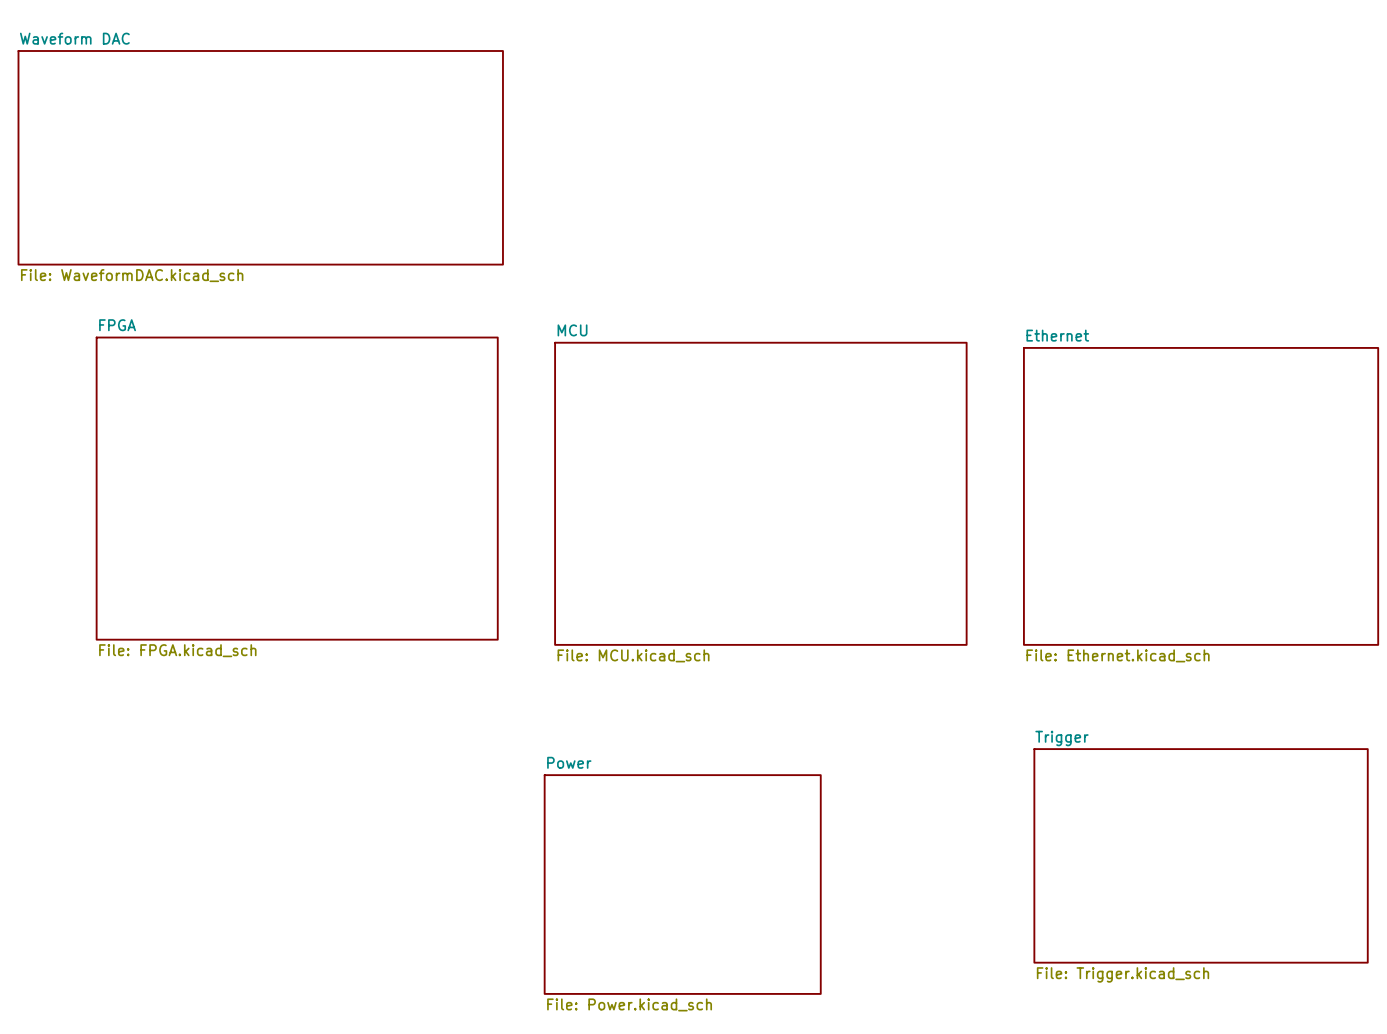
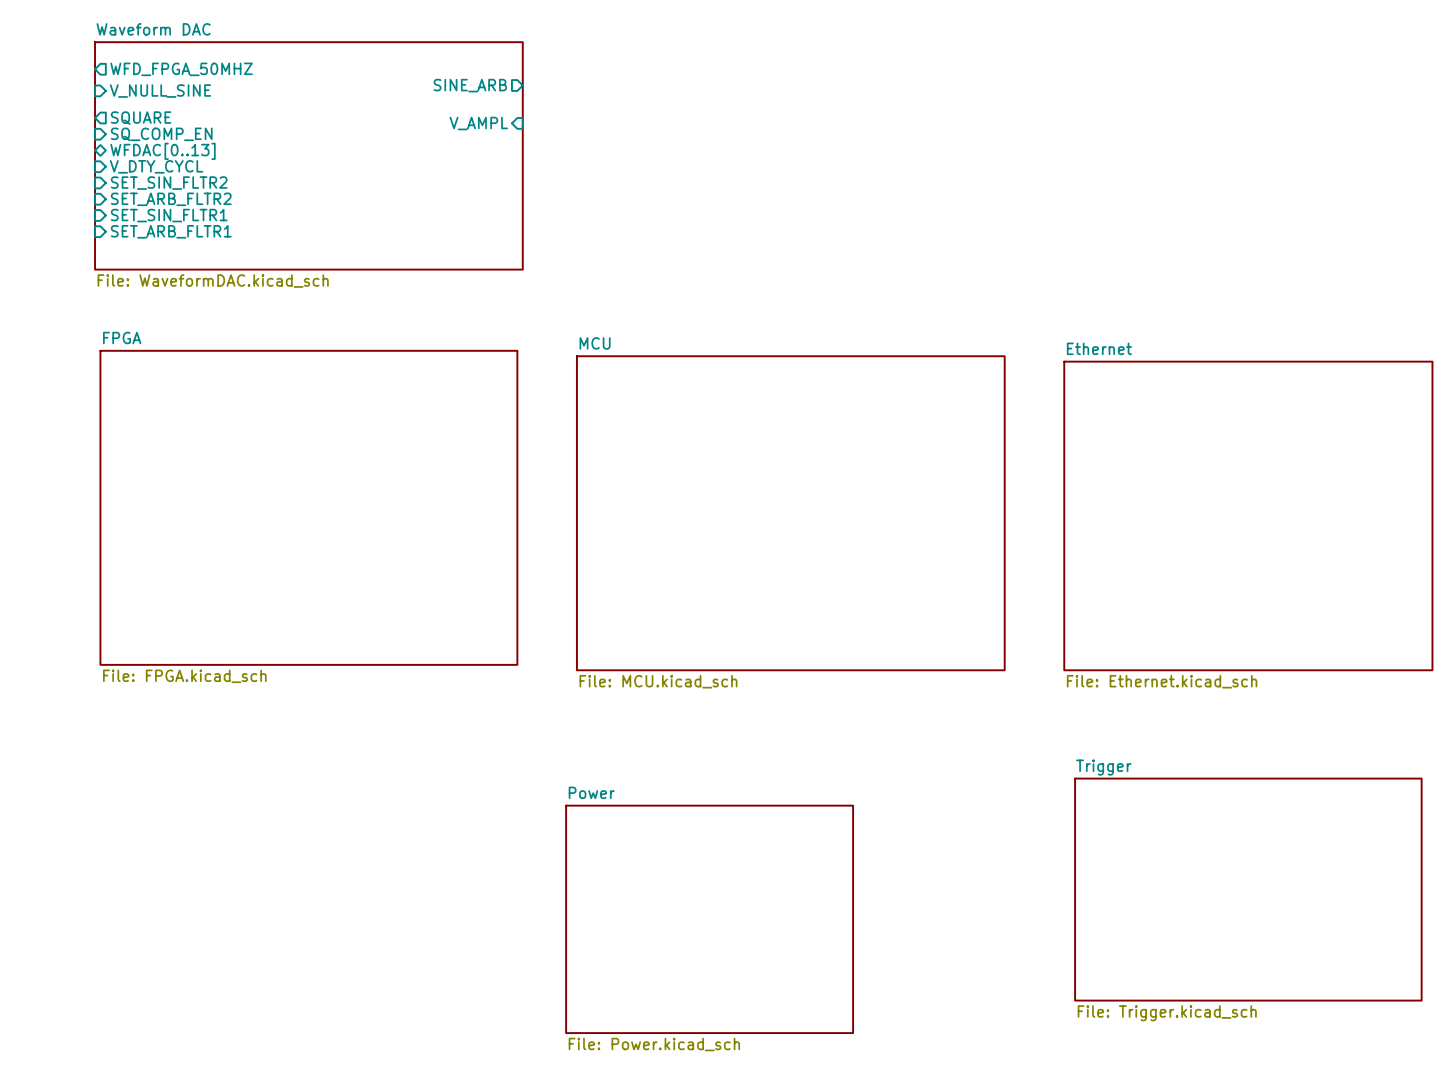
sheet pin: none -> WFD_FPGA_50MHZ (181, 69)
sheet pin: none -> SINE_ARB (470, 85)
sheet pin: none -> V_NULL_SINE (160, 91)
sheet pin: none -> SQUARE (141, 118)
sheet pin: none -> V_AMPL (478, 123)
sheet pin: none -> SQ_COMP_EN (161, 134)
sheet pin: none -> WFDAC[0..13] (163, 151)
sheet Waveform DAC: none -> File: WaveformDAC.kicad_sch (308, 155)
sheet Waveform DAC: File: WaveformDAC.kicad_sch (260, 157) -> none
sheet pin: none -> V_DTY_CYCL (156, 166)
sheet pin: none -> SET_SIN_FLTR2 (169, 183)
sheet pin: none -> SET_ARB_FLTR2 (171, 199)
sheet pin: none -> SET_SIN_FLTR1 (169, 215)
sheet pin: none -> SET_ARB_FLTR1 (171, 231)

